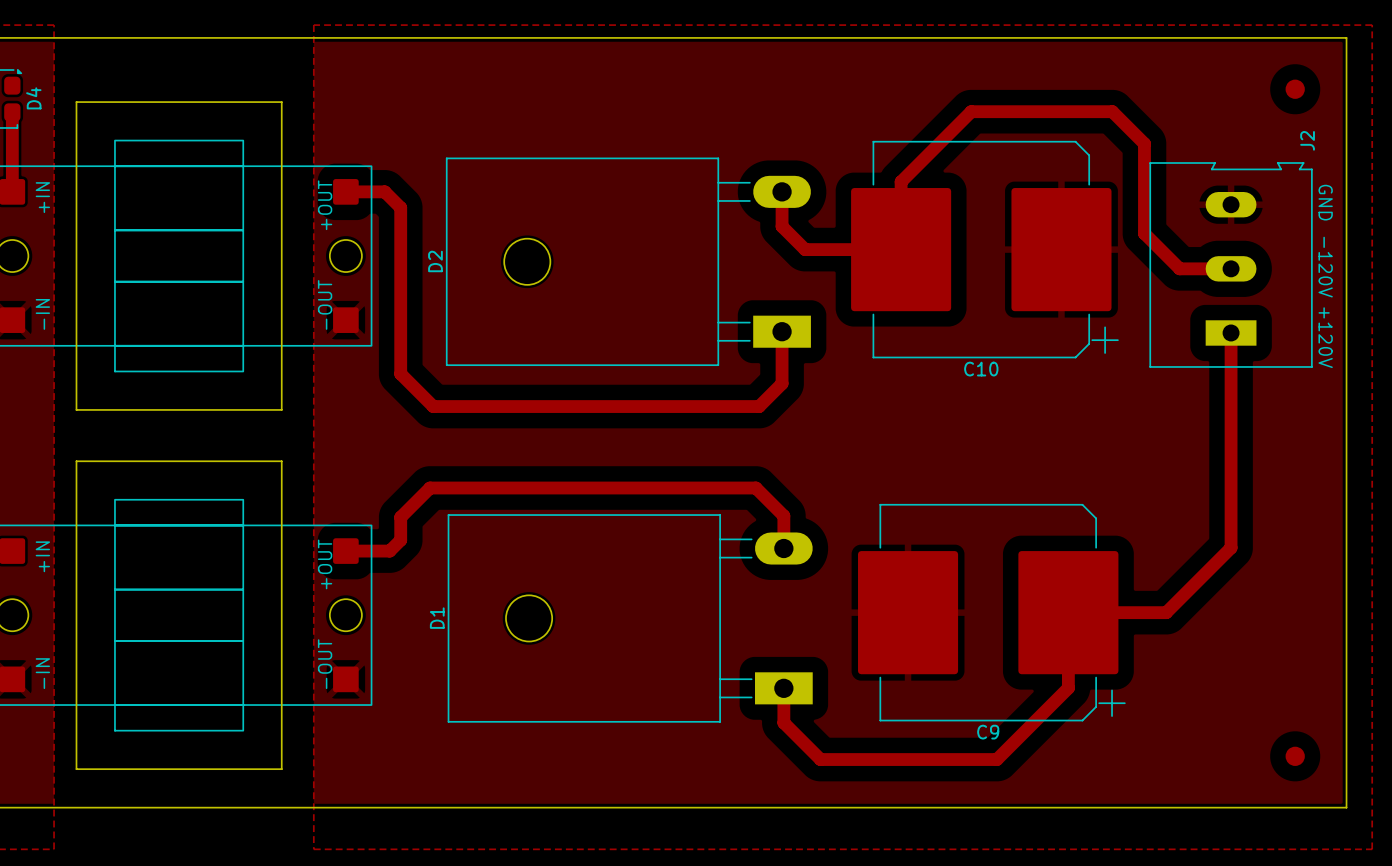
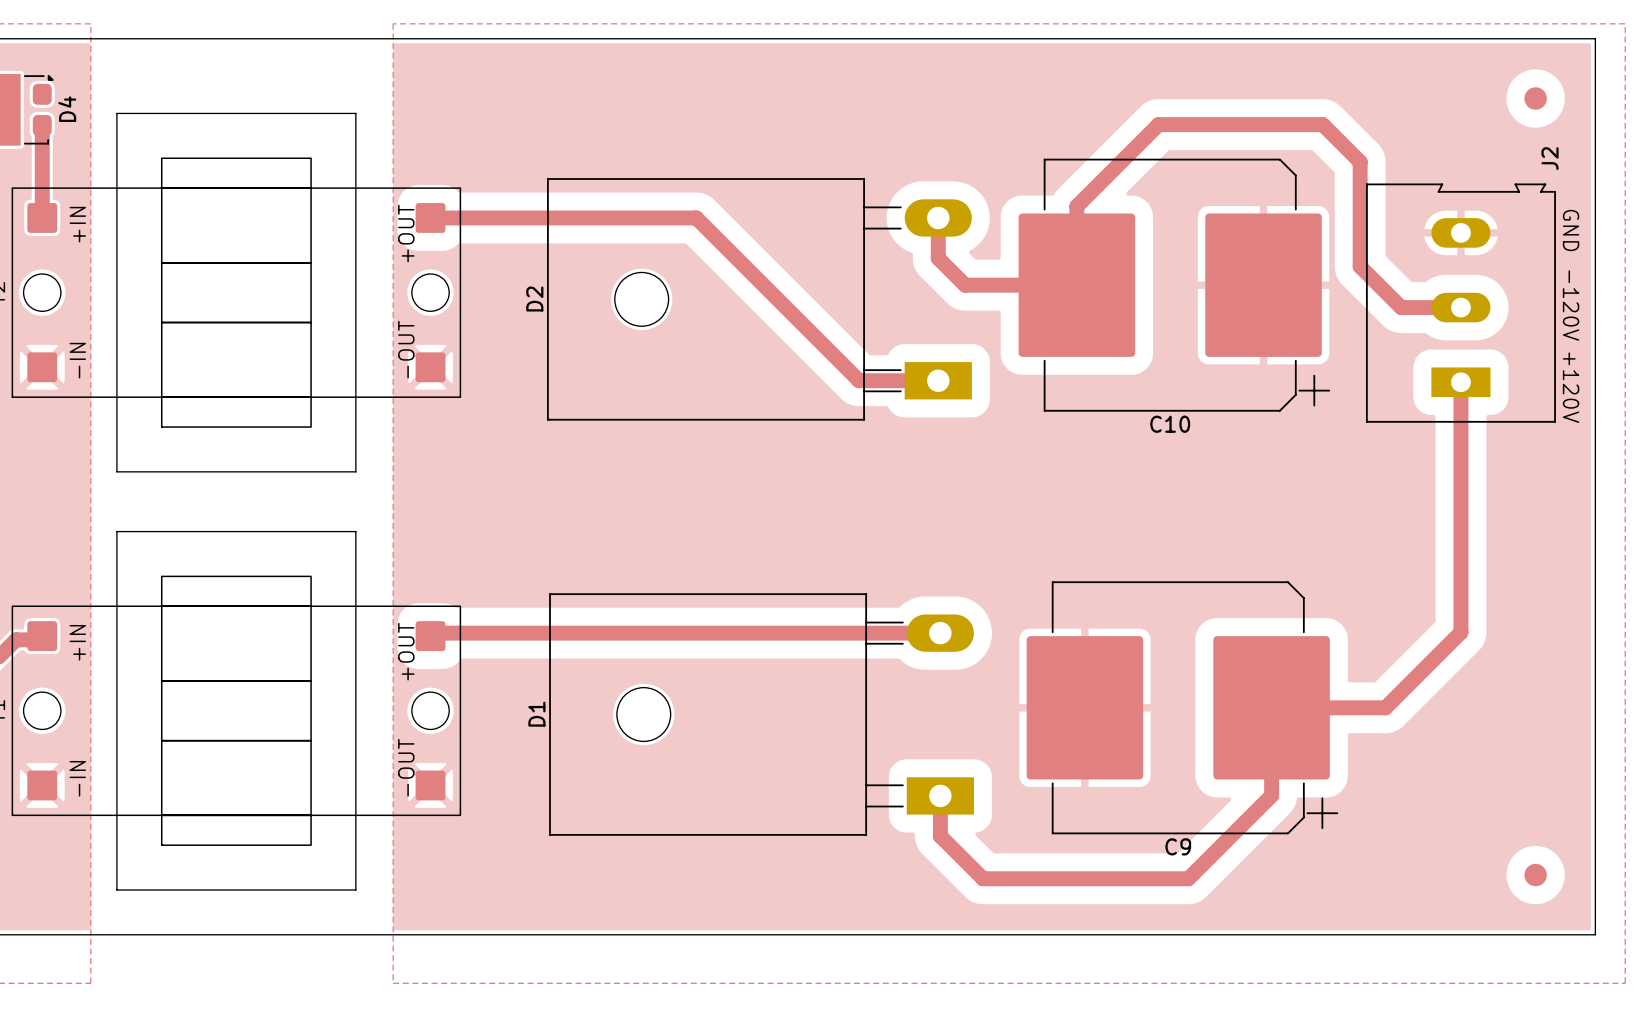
track: (384, 191) (400, 207) (400, 373) (433, 406) (759, 406) (782, 383) (782, 331) -> (475, 217) (696, 217) (859, 380) (938, 380)
track: (783, 548) (783, 515) (755, 488) (430, 488) (400, 517) (400, 540) (389, 551) (345, 551) -> (940, 633) (433, 633) (430, 636)

